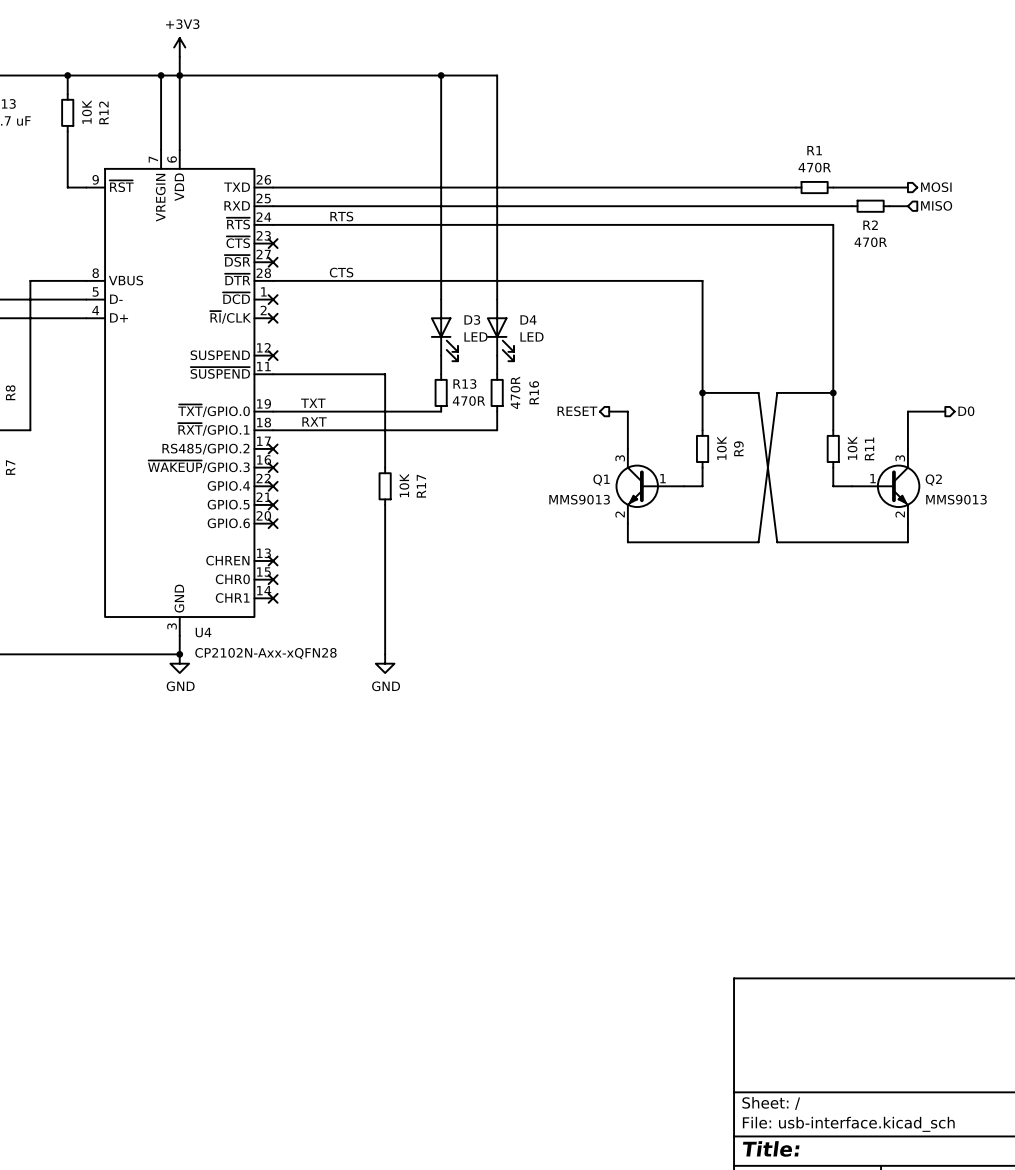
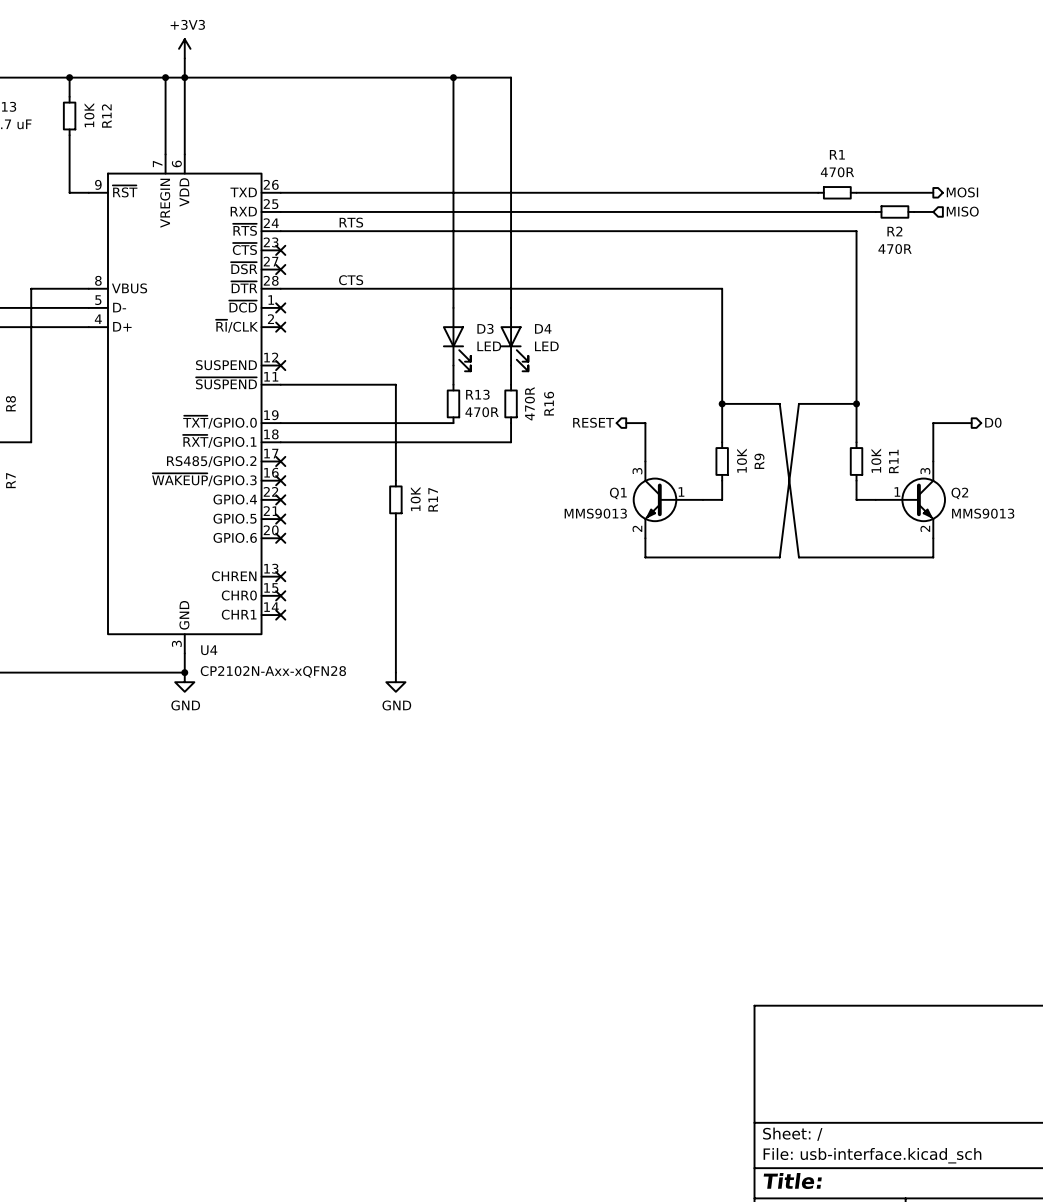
label: TXT (313, 403) -> none
label: RXT (314, 421) -> none

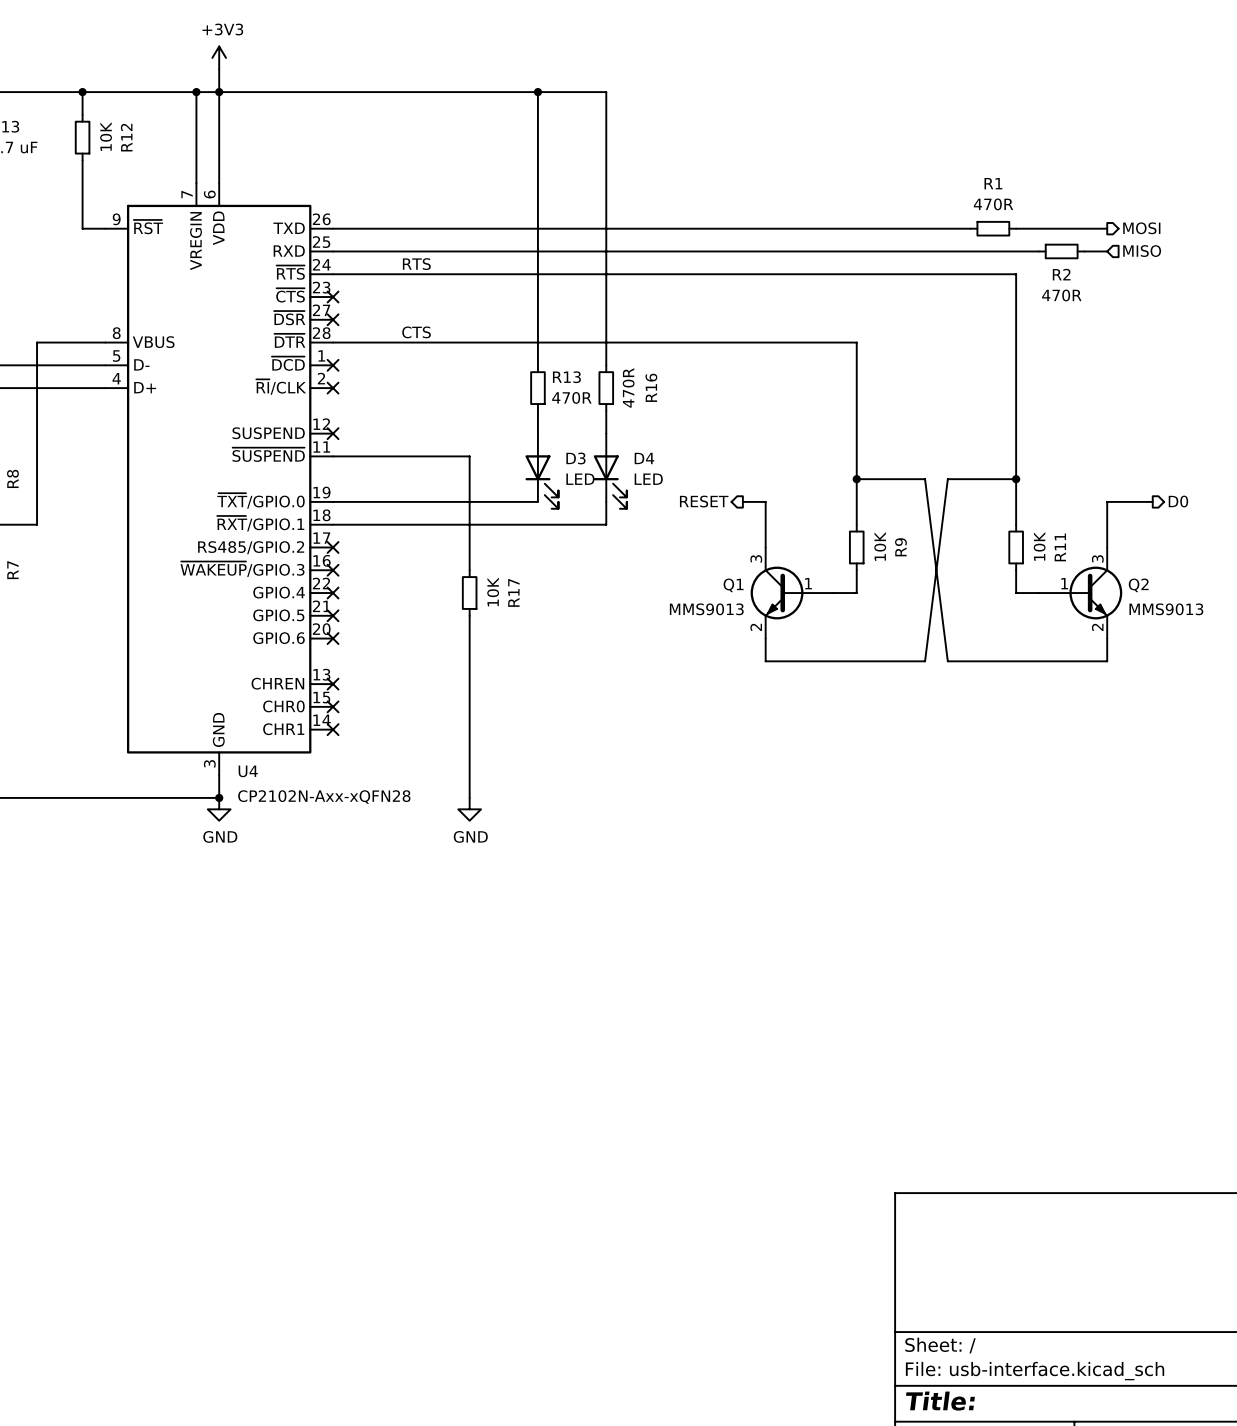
D3 position: (456, 339) -> (541, 471)
D4 position: (514, 339) -> (610, 471)
R13 position: (453, 403) -> (537, 388)
R16 position: (511, 403) -> (606, 388)

